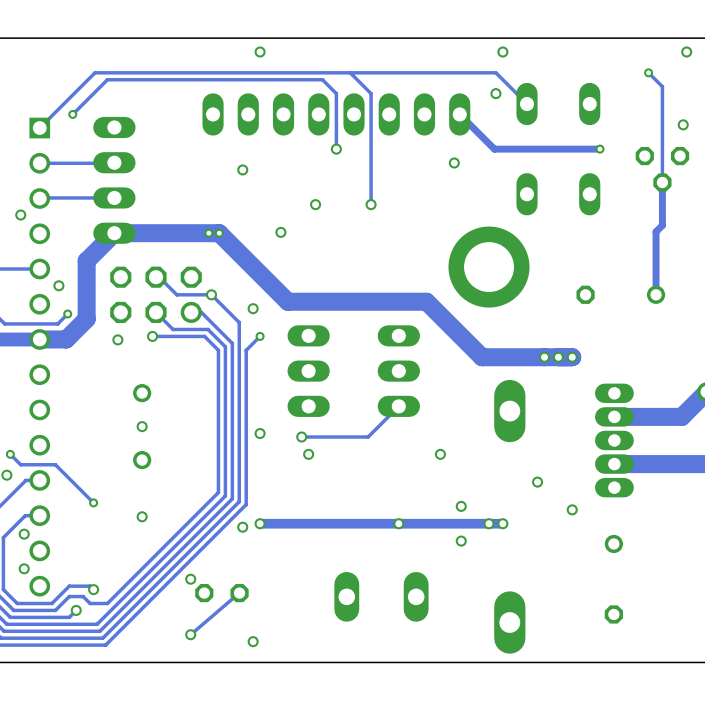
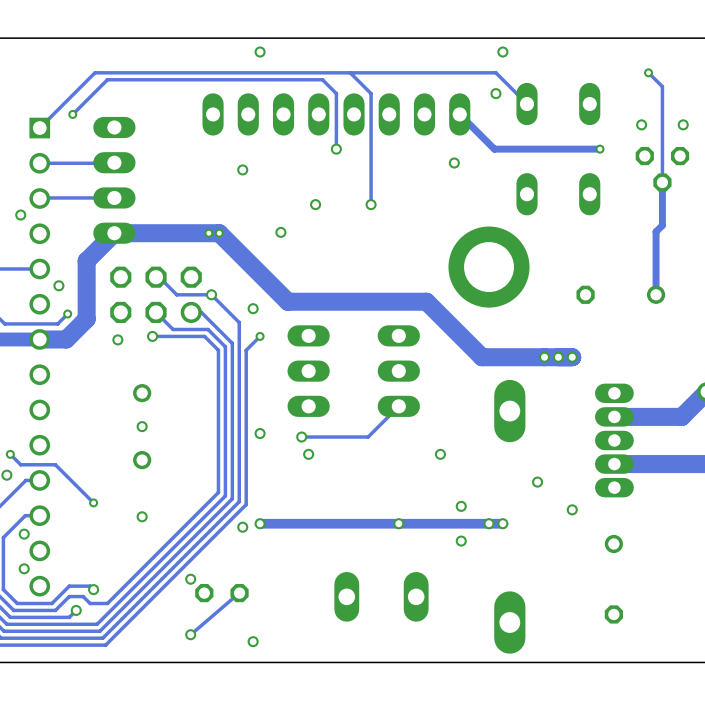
via: (686, 52) -> none
via: none -> (641, 124)

